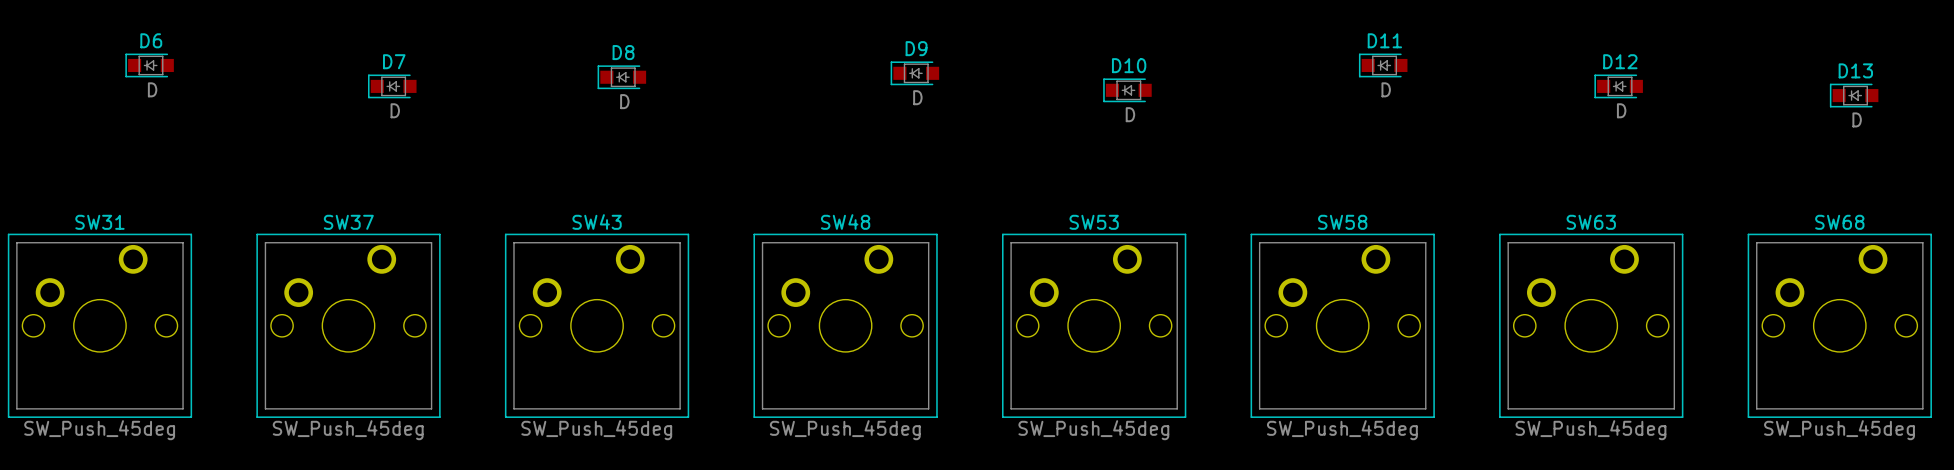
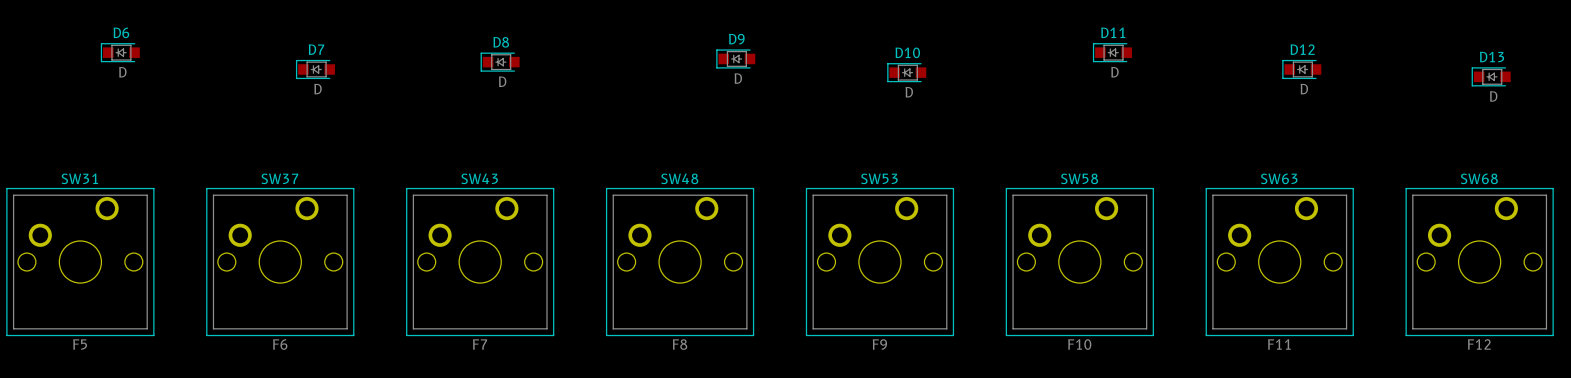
SW31 value: SW_Push_45deg (99, 430) -> F5 (80, 344)
SW37 value: SW_Push_45deg (348, 430) -> F6 (280, 344)
SW43 value: SW_Push_45deg (596, 430) -> F7 (480, 344)
SW48 value: SW_Push_45deg (845, 430) -> F8 (680, 344)
SW53 value: SW_Push_45deg (1093, 430) -> F9 (879, 344)
SW58 value: SW_Push_45deg (1342, 430) -> F10 (1079, 344)
SW63 value: SW_Push_45deg (1590, 430) -> F11 (1279, 344)
SW68 value: SW_Push_45deg (1839, 430) -> F12 (1479, 344)

